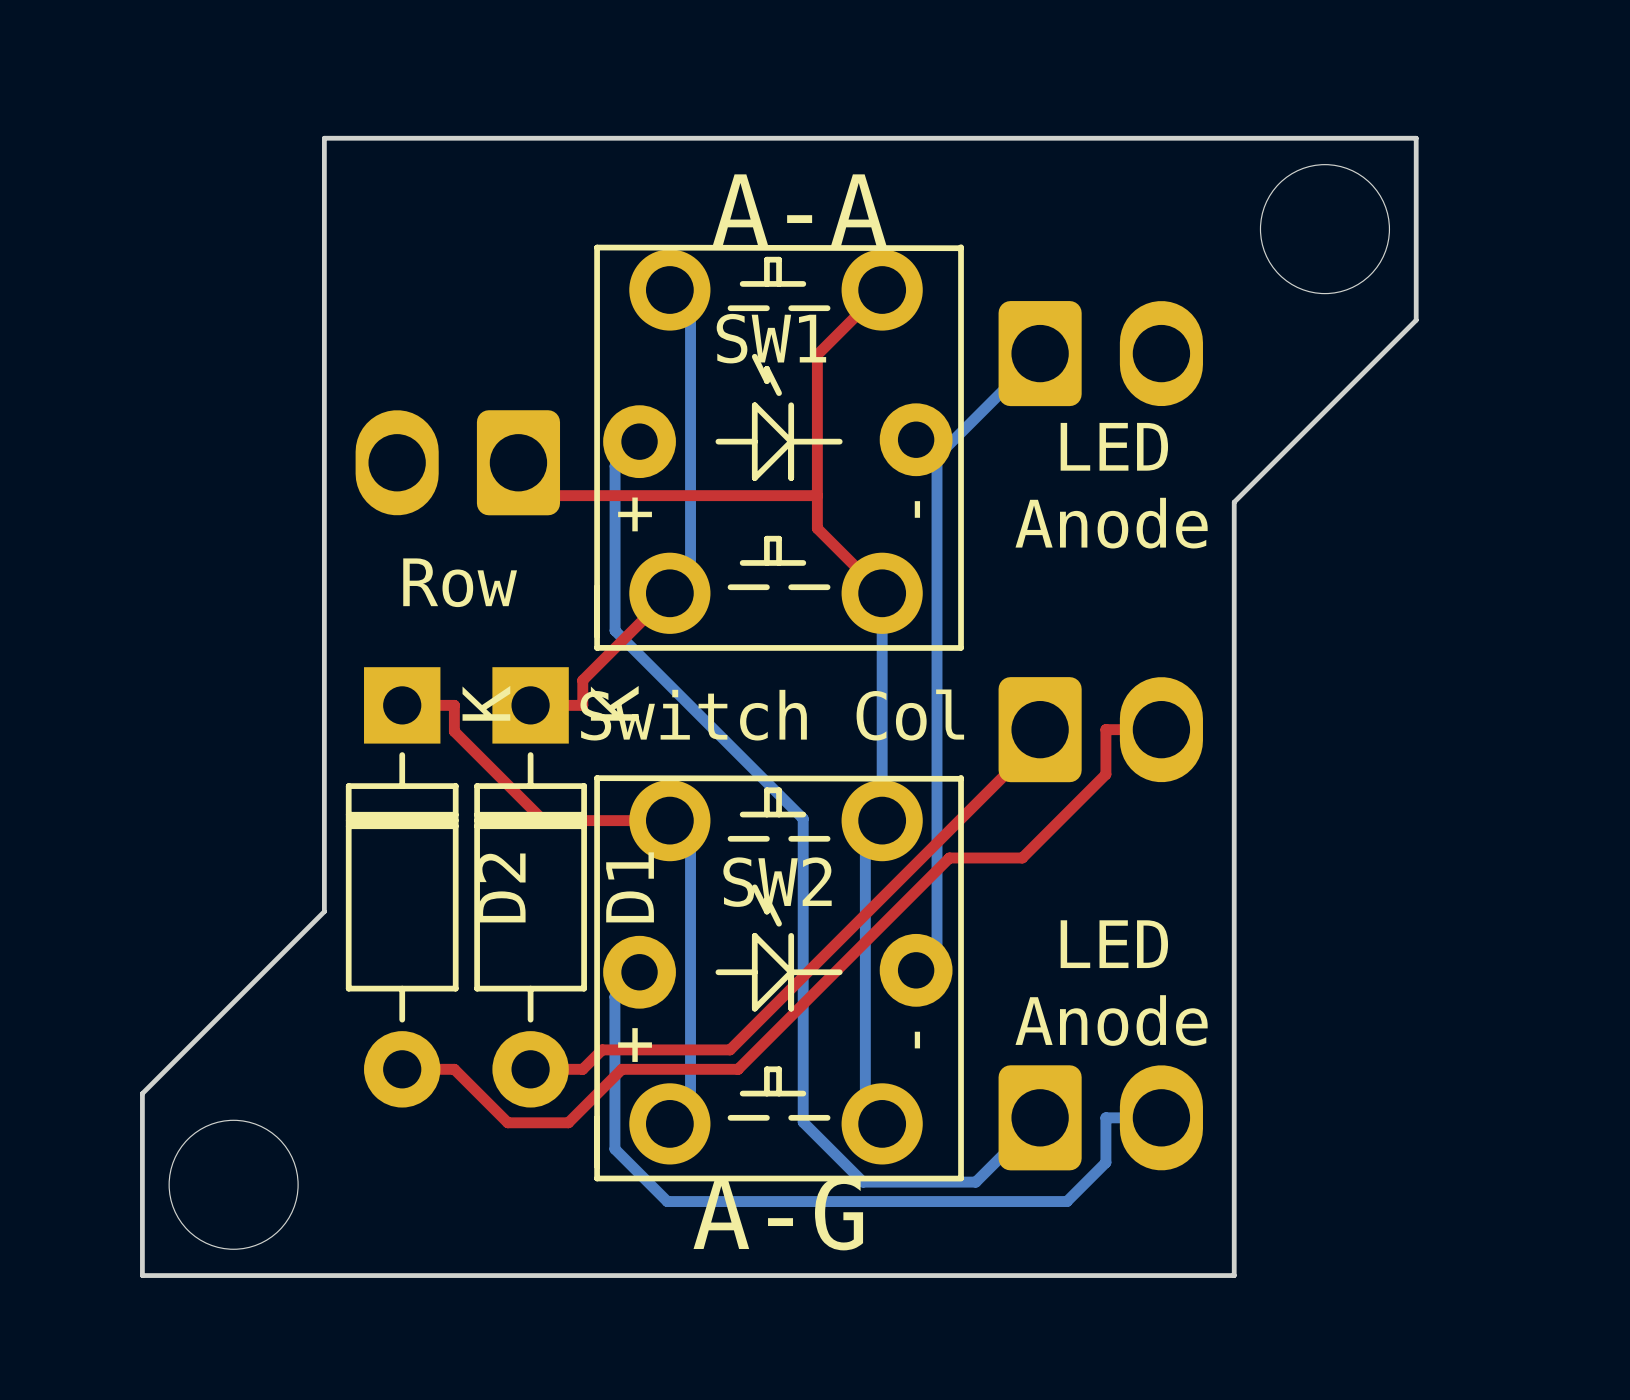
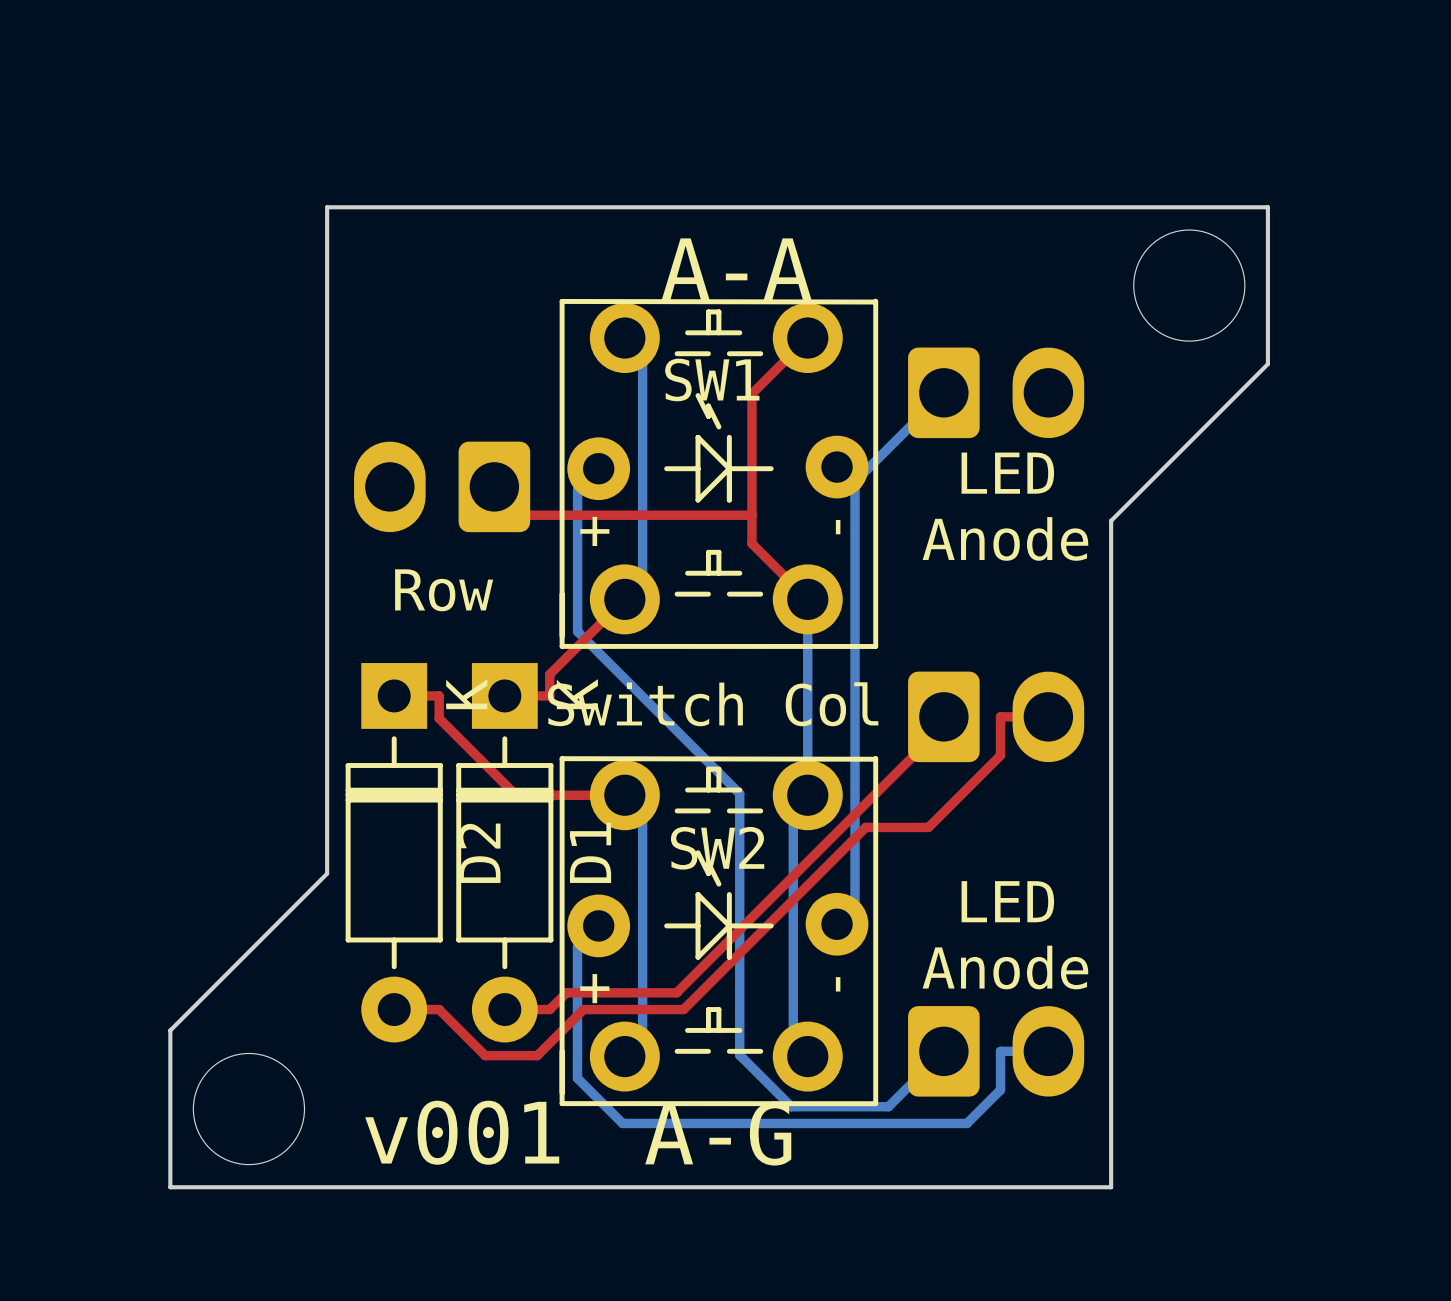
text: none -> v001 (462, 1132)

